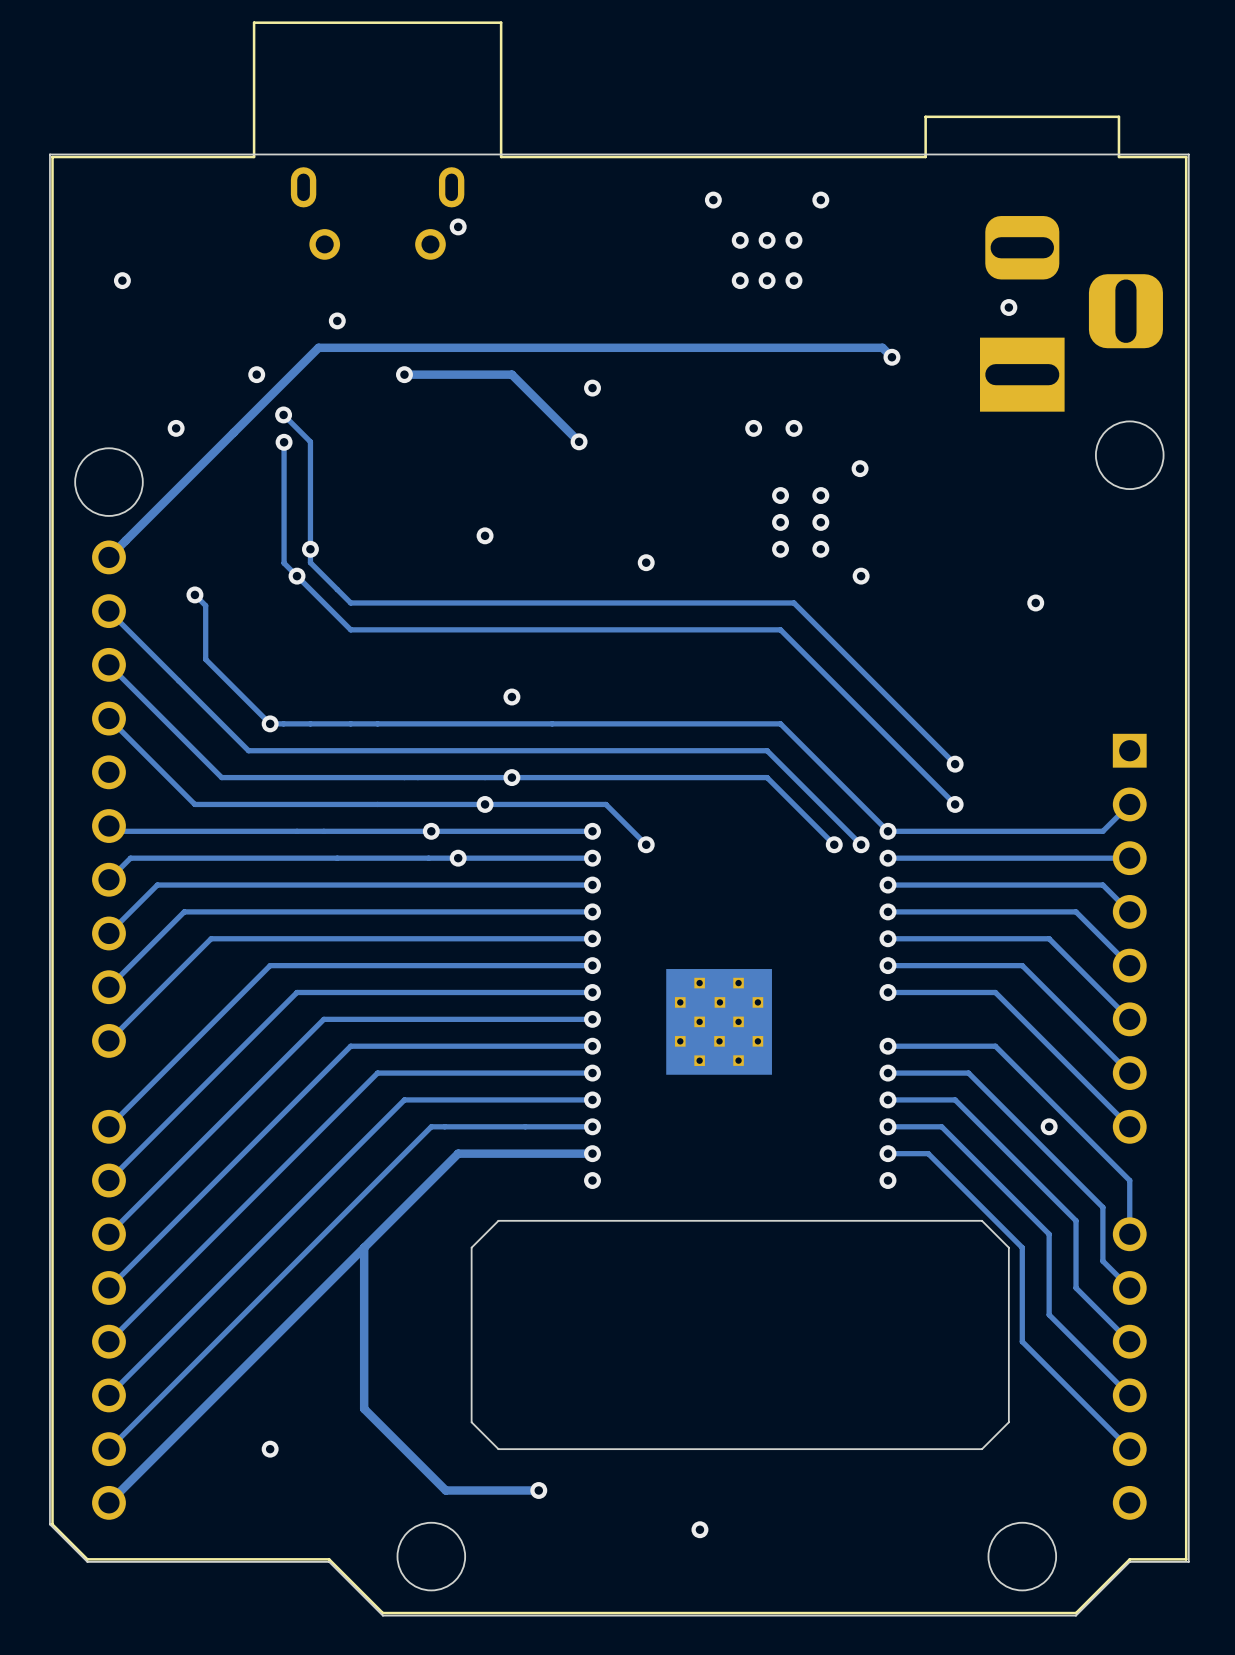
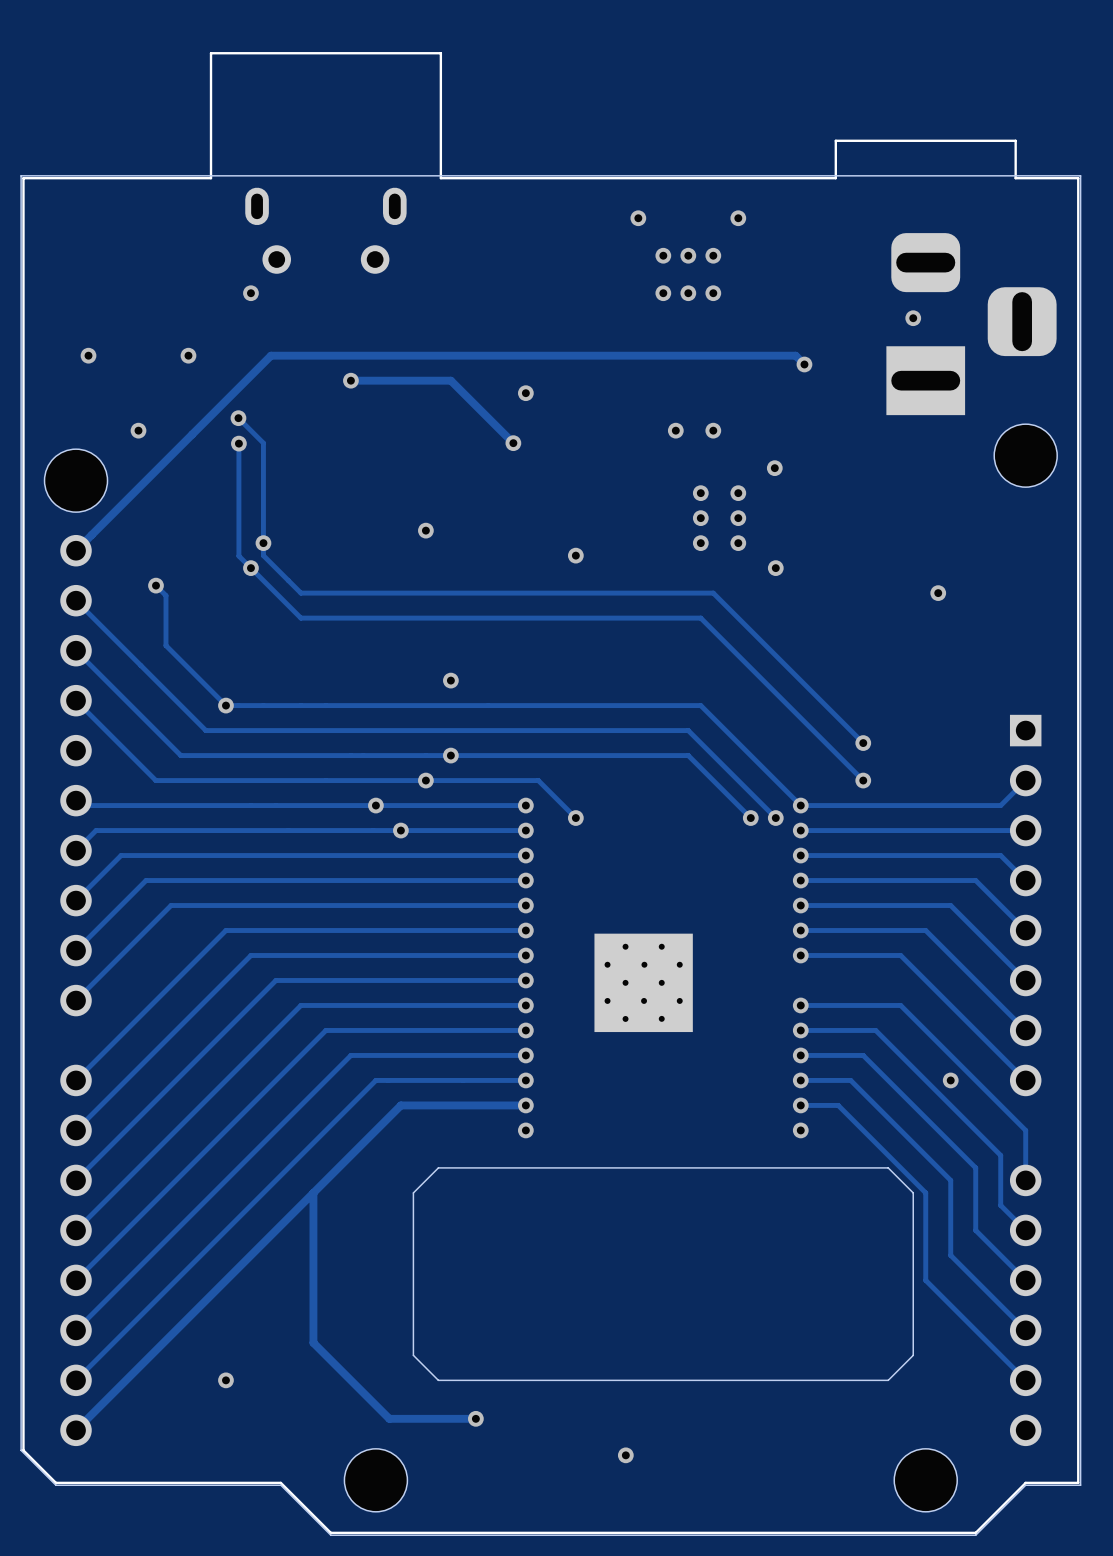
via: (458, 226) -> none
via: (122, 280) -> none
via: none -> (250, 293)
via: (337, 320) -> none
via: none -> (88, 355)
via position: (256, 374) -> (188, 355)

